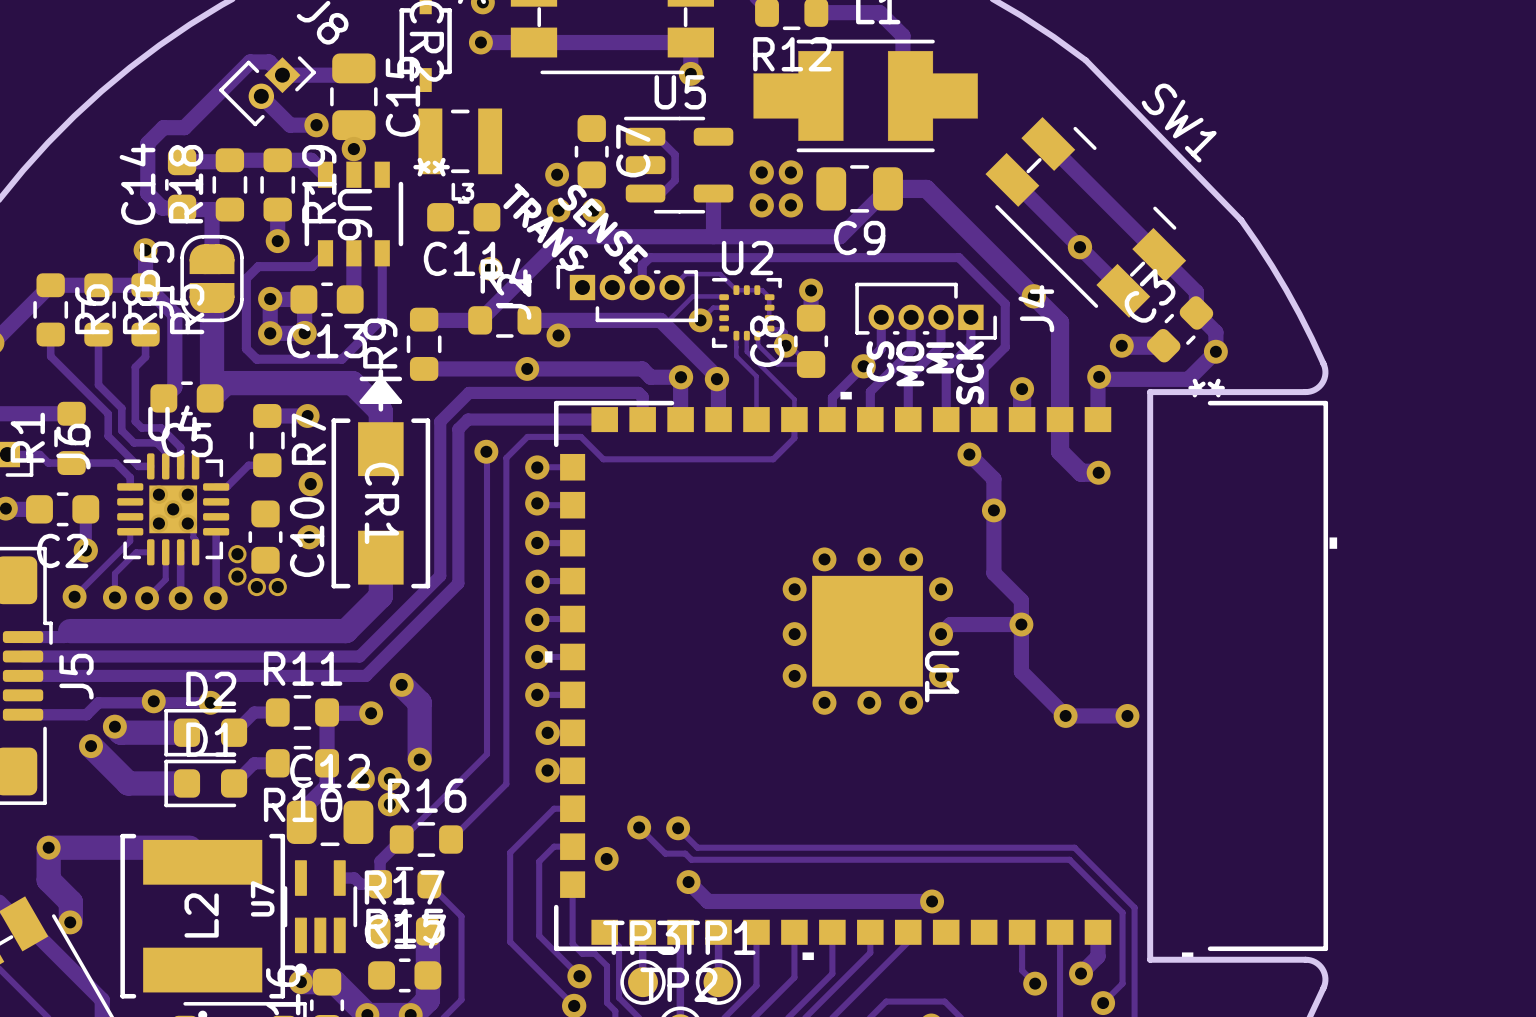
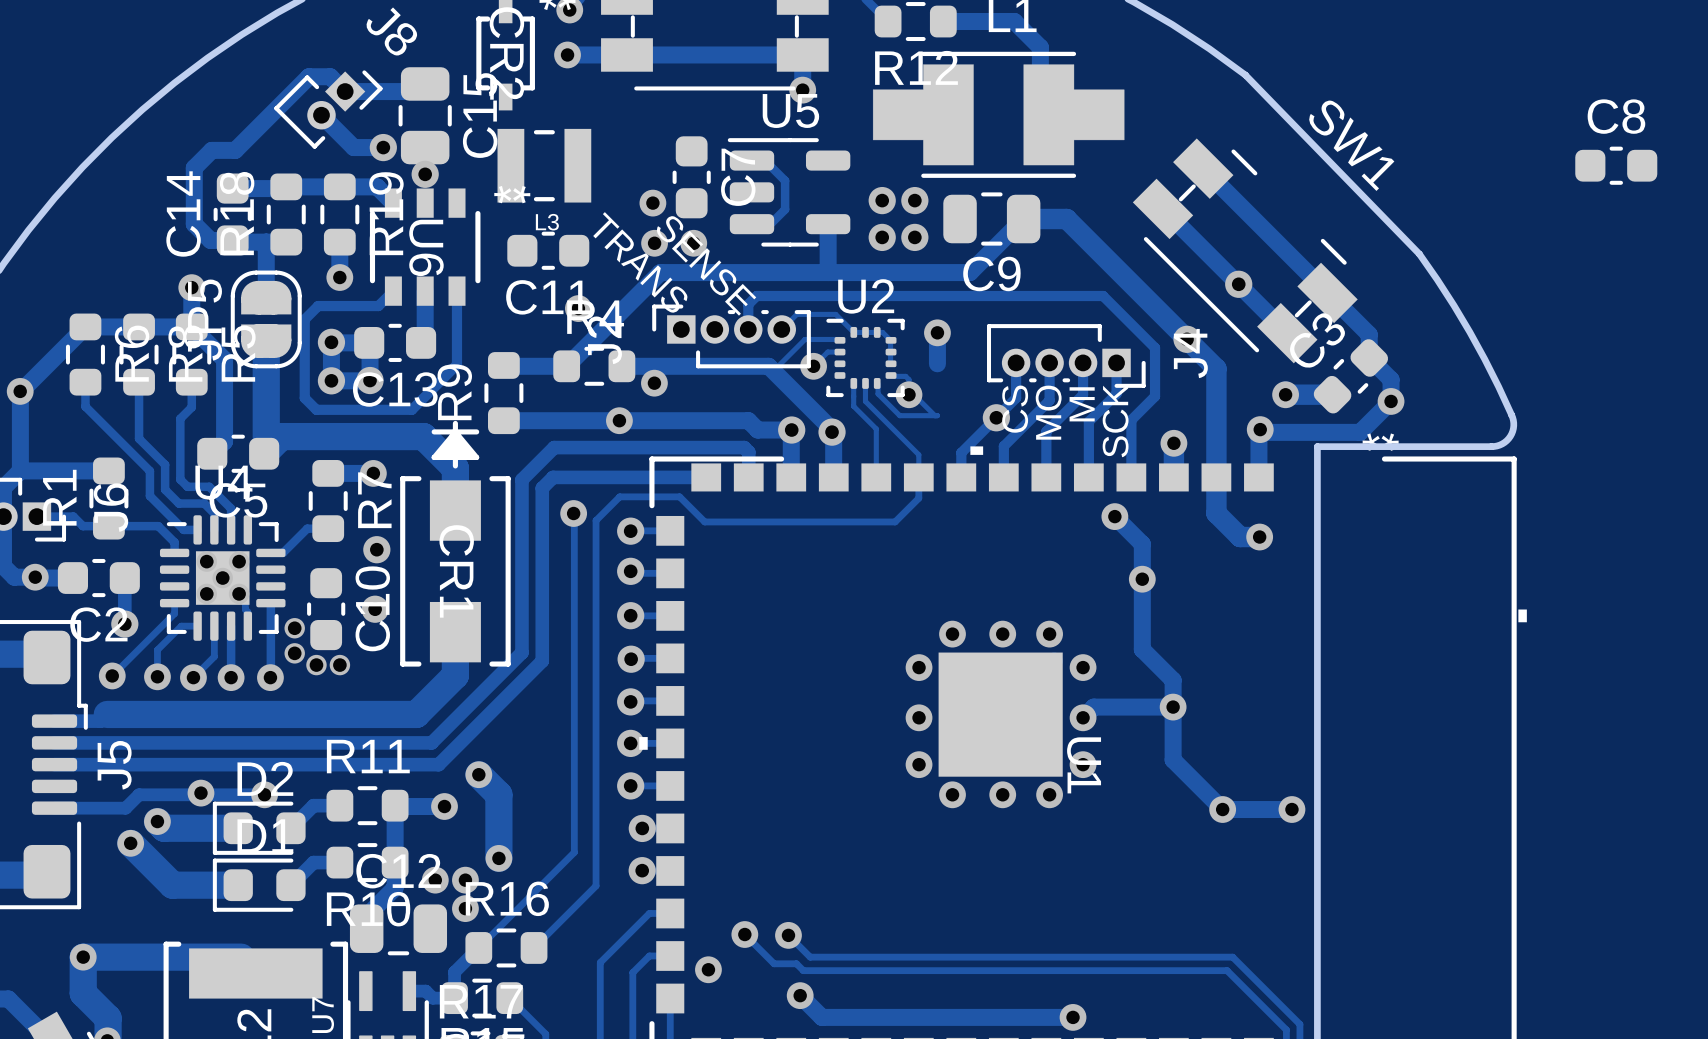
C8 rotation: 0° (811, 341) -> 90° clockwise (1616, 165)
C8 position: (811, 341) -> (1616, 165)

